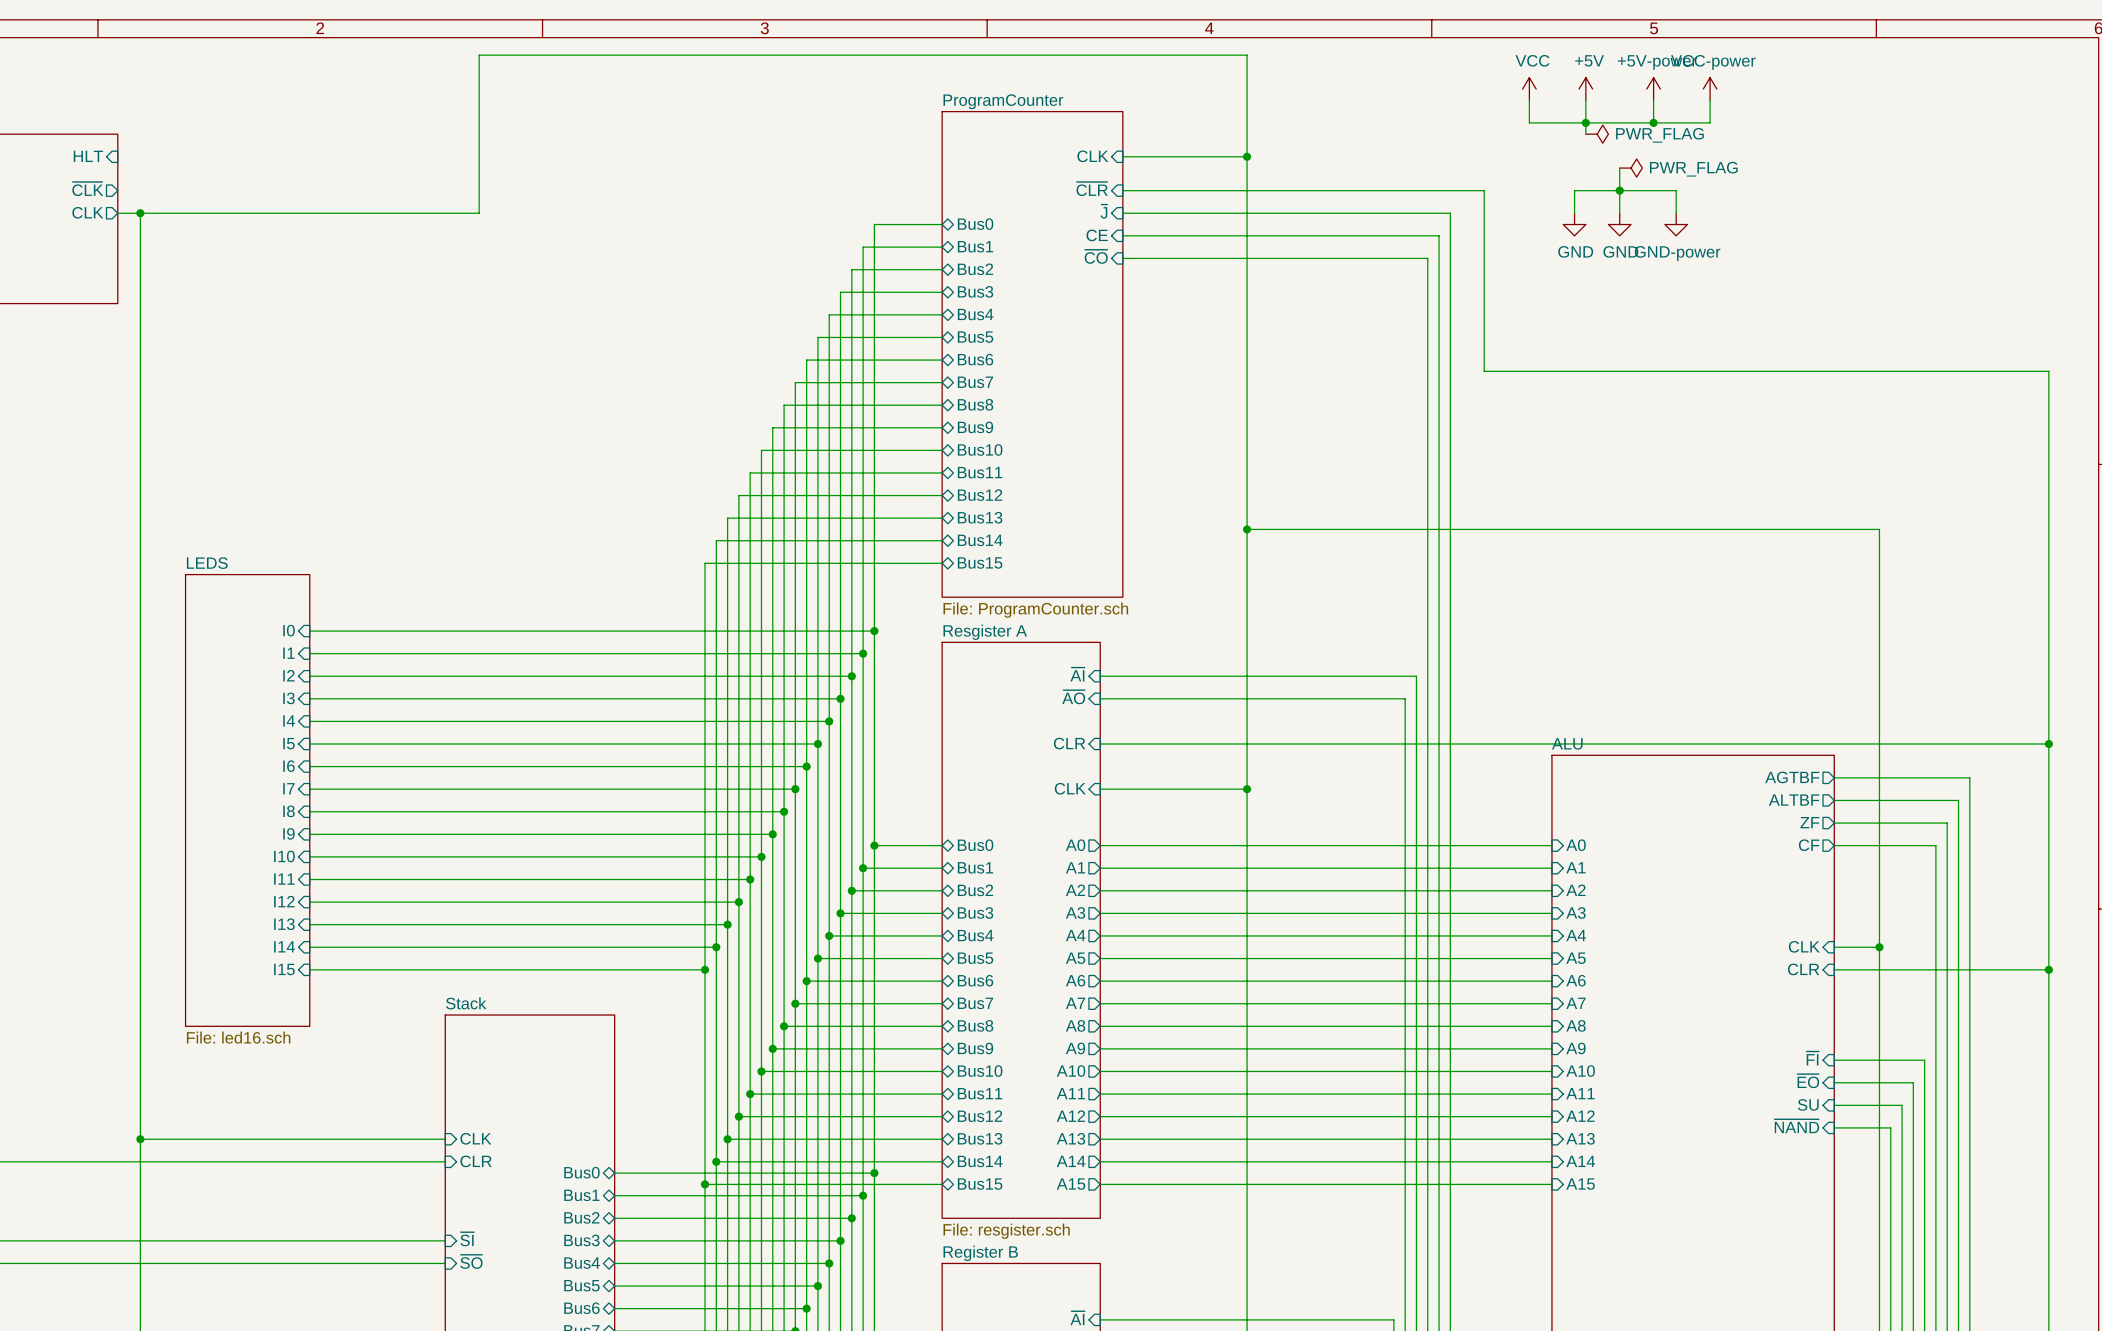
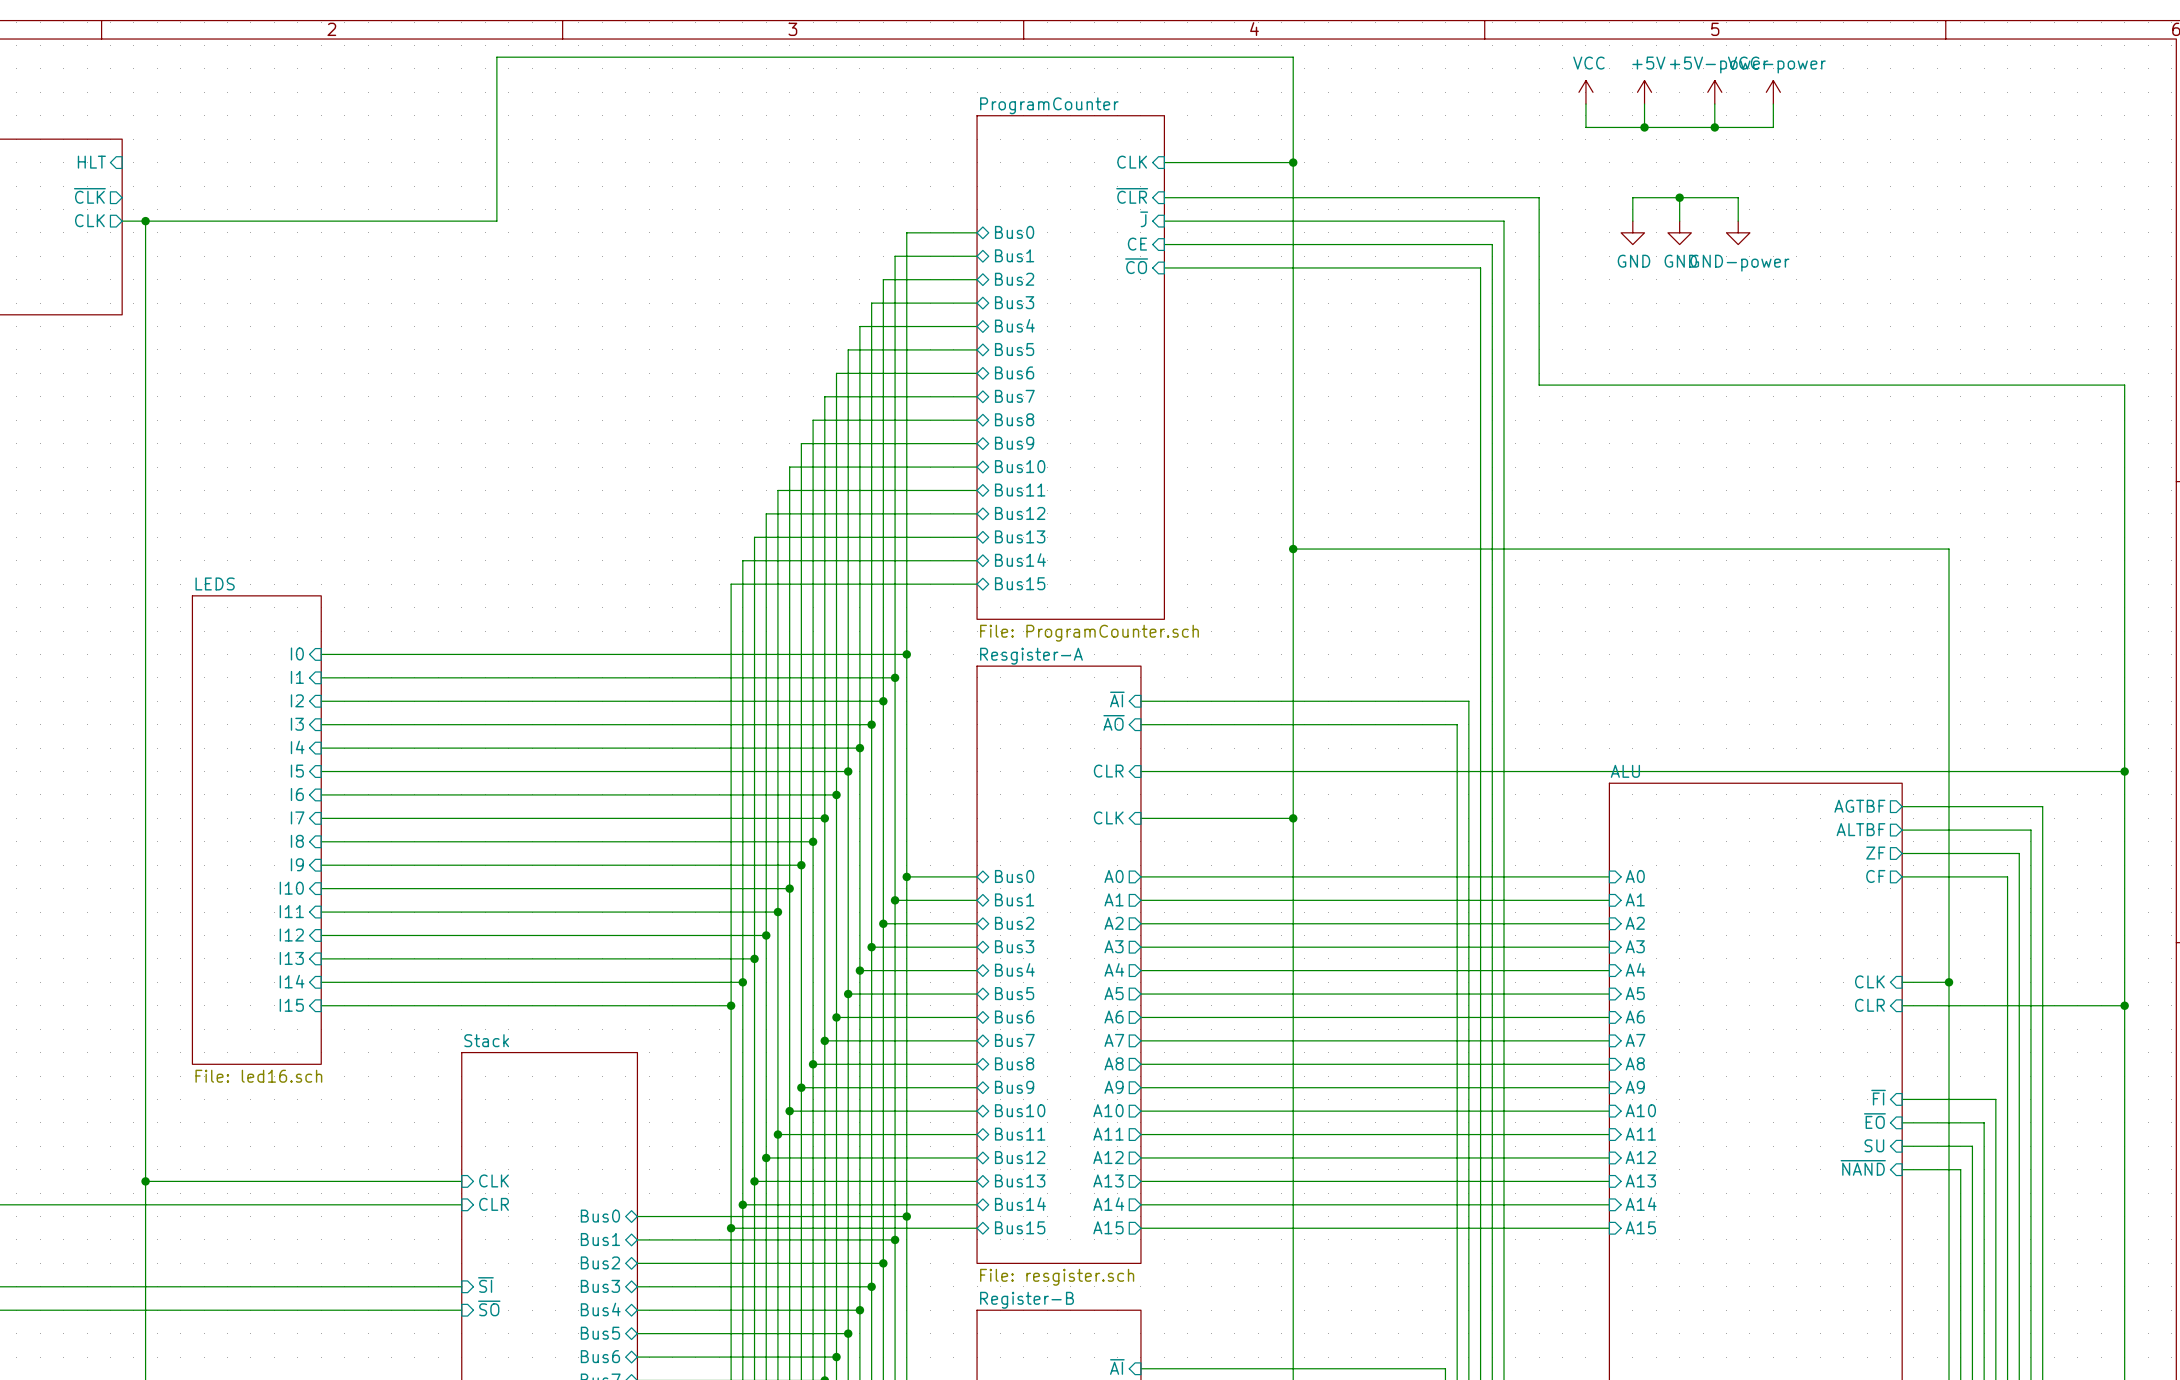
wire: (1585, 122) (1585, 134) -> none
power symbol: PWR_FLAG (1597, 134) -> none
wire: (1619, 168) (1619, 190) -> none
power symbol: PWR_FLAG (1631, 168) -> none
sheet Resgister A name: Resgister A (985, 632) -> Resgister-A (1031, 656)
sheet Register B name: Register B (980, 1253) -> Register-B (1027, 1300)

